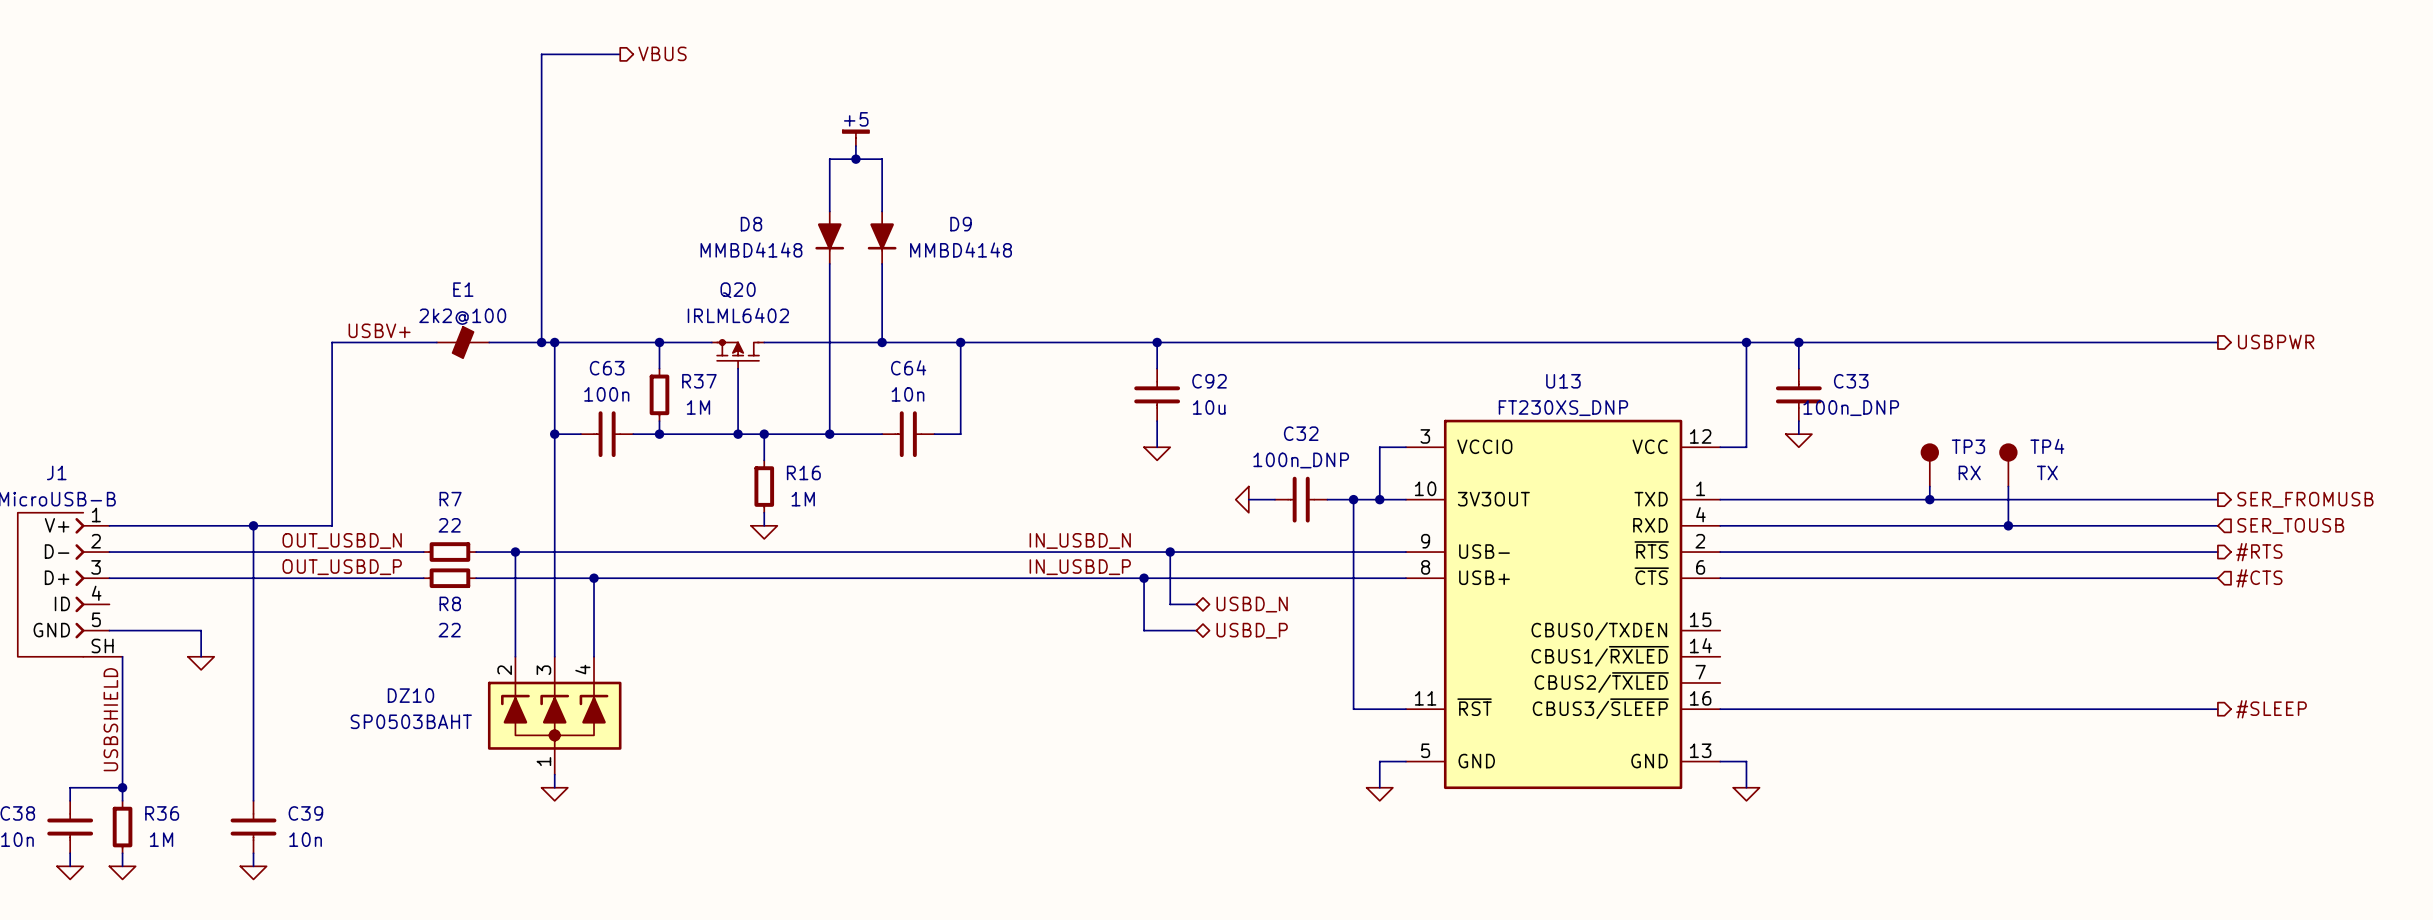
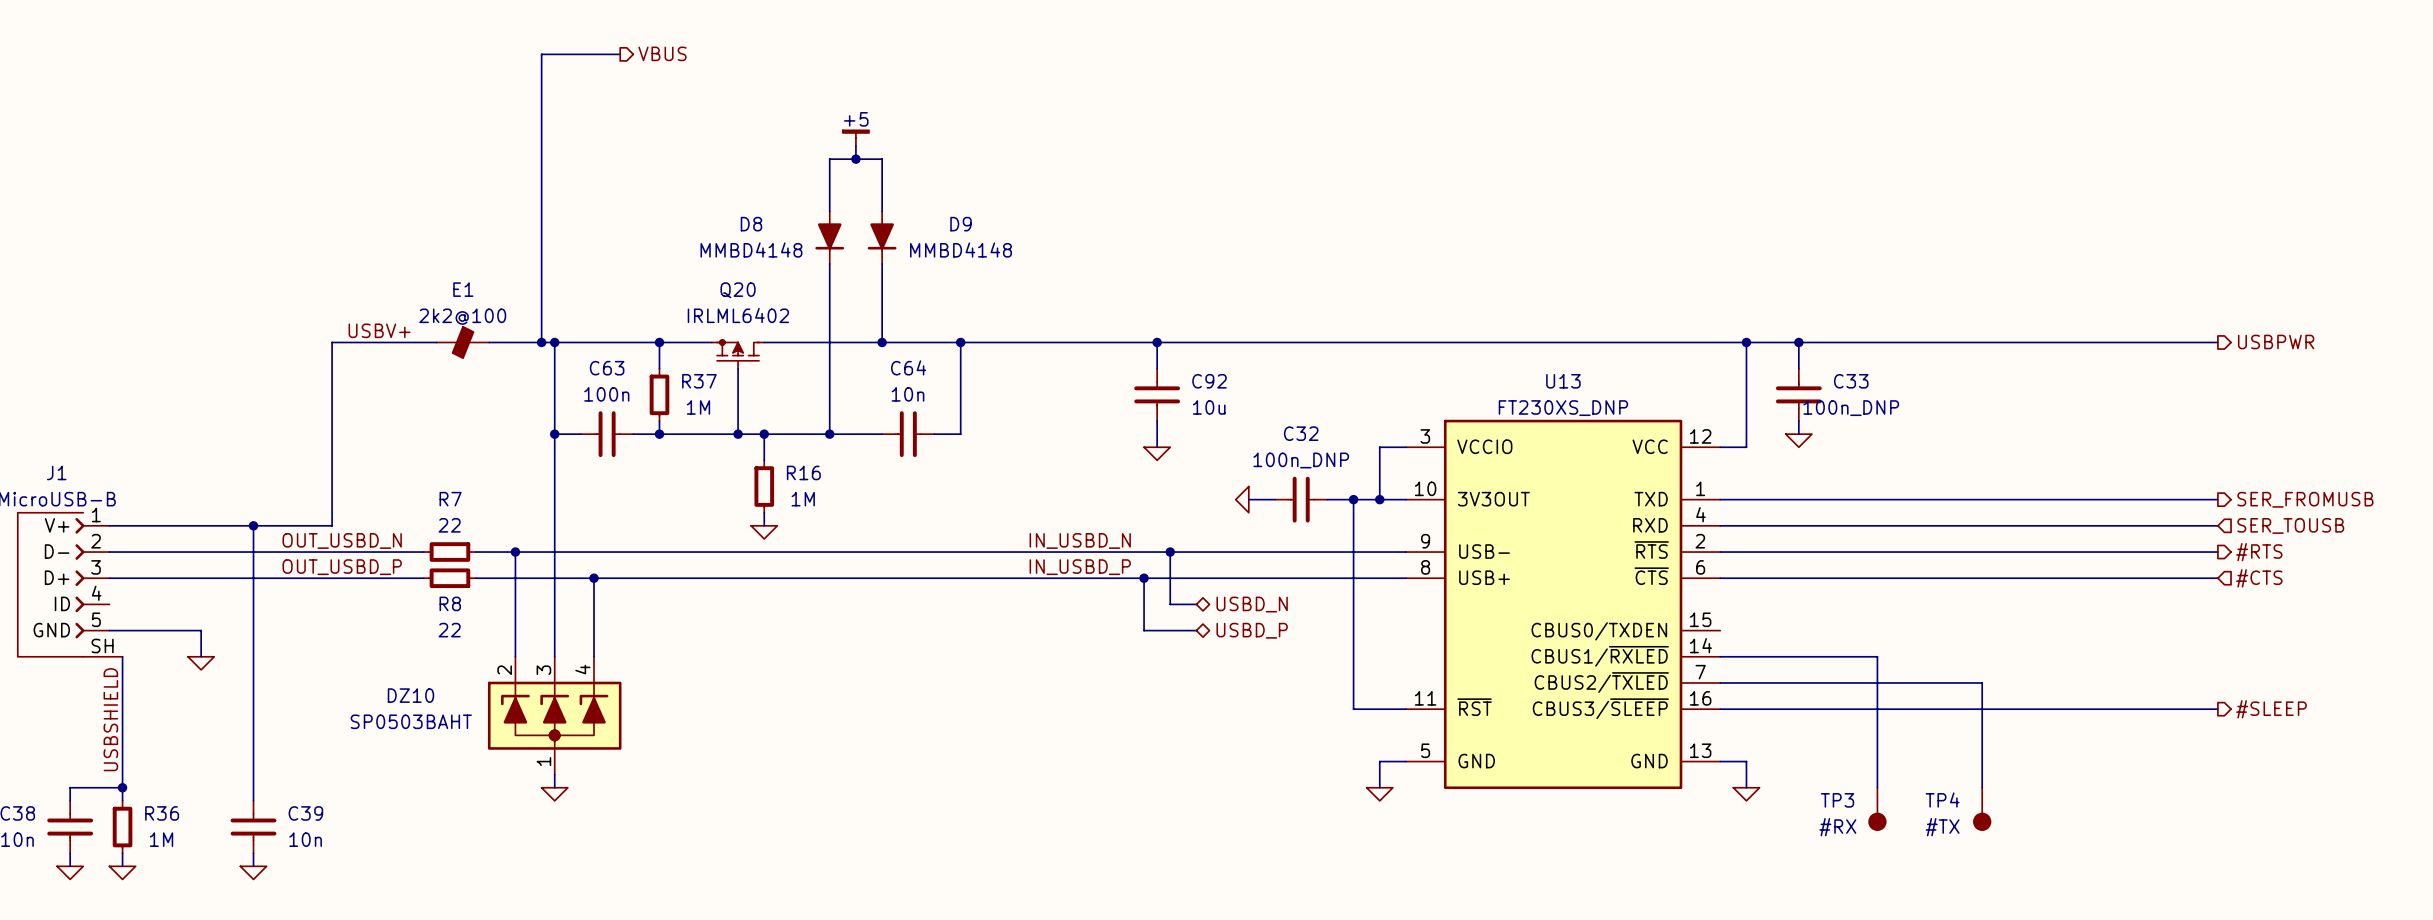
TP3 name position: TP3 (1968, 446) -> TP3 (1837, 800)
TP4 name position: TP4 (2047, 446) -> TP4 (1942, 800)
TP3 rotation: 0° (1929, 452) -> 180° (1877, 821)
TP4 rotation: 0° (2008, 452) -> 180° (1982, 821)
TP3 position: (1929, 464) -> (1877, 809)
TP4 position: (2008, 464) -> (1982, 809)
TP3 value: RX (1969, 472) -> #RX (1837, 827)
TP4 value: TX (2047, 472) -> #TX (1942, 827)
wire: (1929, 486) (1929, 499) -> none
wire: (2008, 486) (2008, 525) -> none
junction: (1929, 499) -> none
junction: (2008, 525) -> none
wire: none -> (1720, 656) (1877, 656) (1877, 787)
wire: none -> (1720, 682) (1982, 682) (1982, 787)

